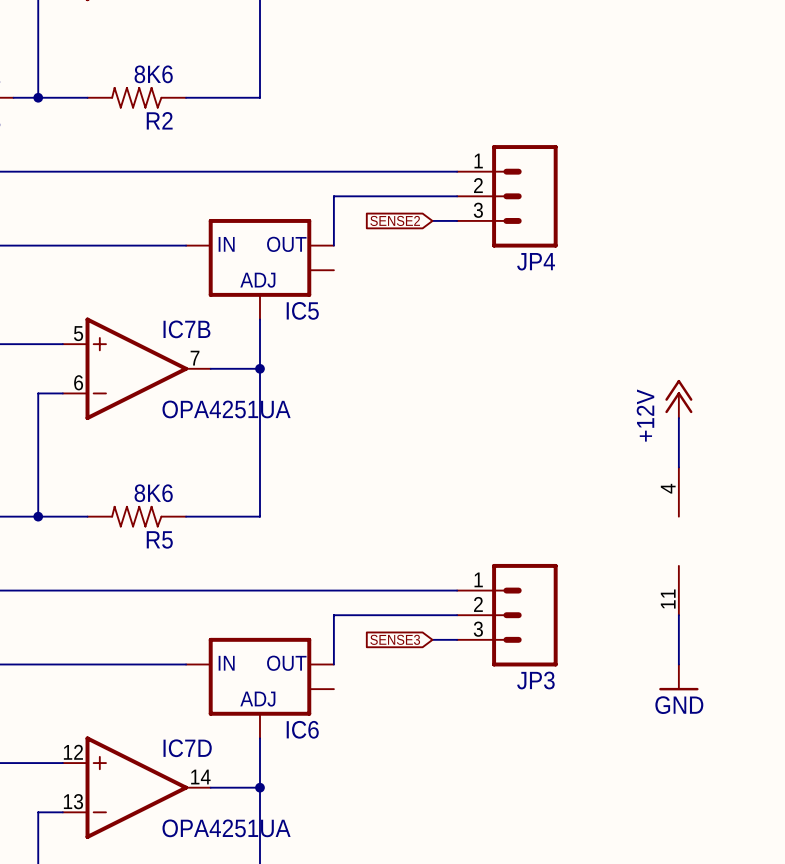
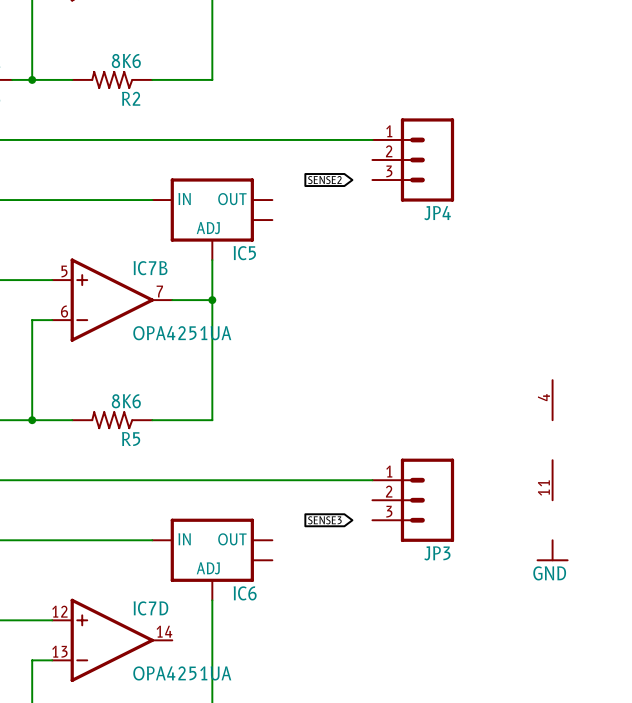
wire: (457, 196) (333, 196) (333, 245) -> none
wire: (432, 220) (457, 220) -> none
power symbol: +12V (678, 398) -> none
wire: (678, 418) (678, 467) -> none
wire: (457, 615) (333, 615) (333, 664) -> none
wire: (678, 615) (678, 664) -> none
wire: (432, 639) (457, 639) -> none
wire: (210, 787) (259, 787) -> none
junction: (259, 787) -> none

